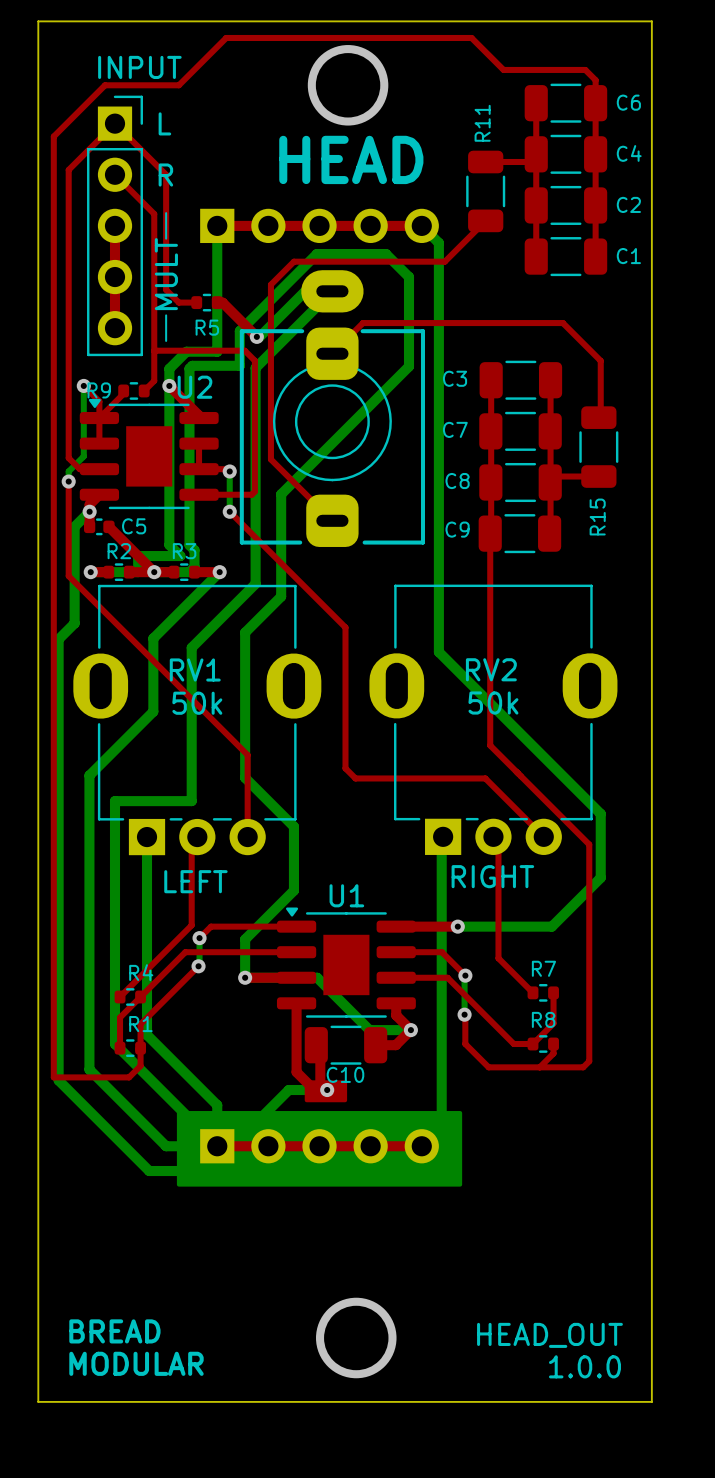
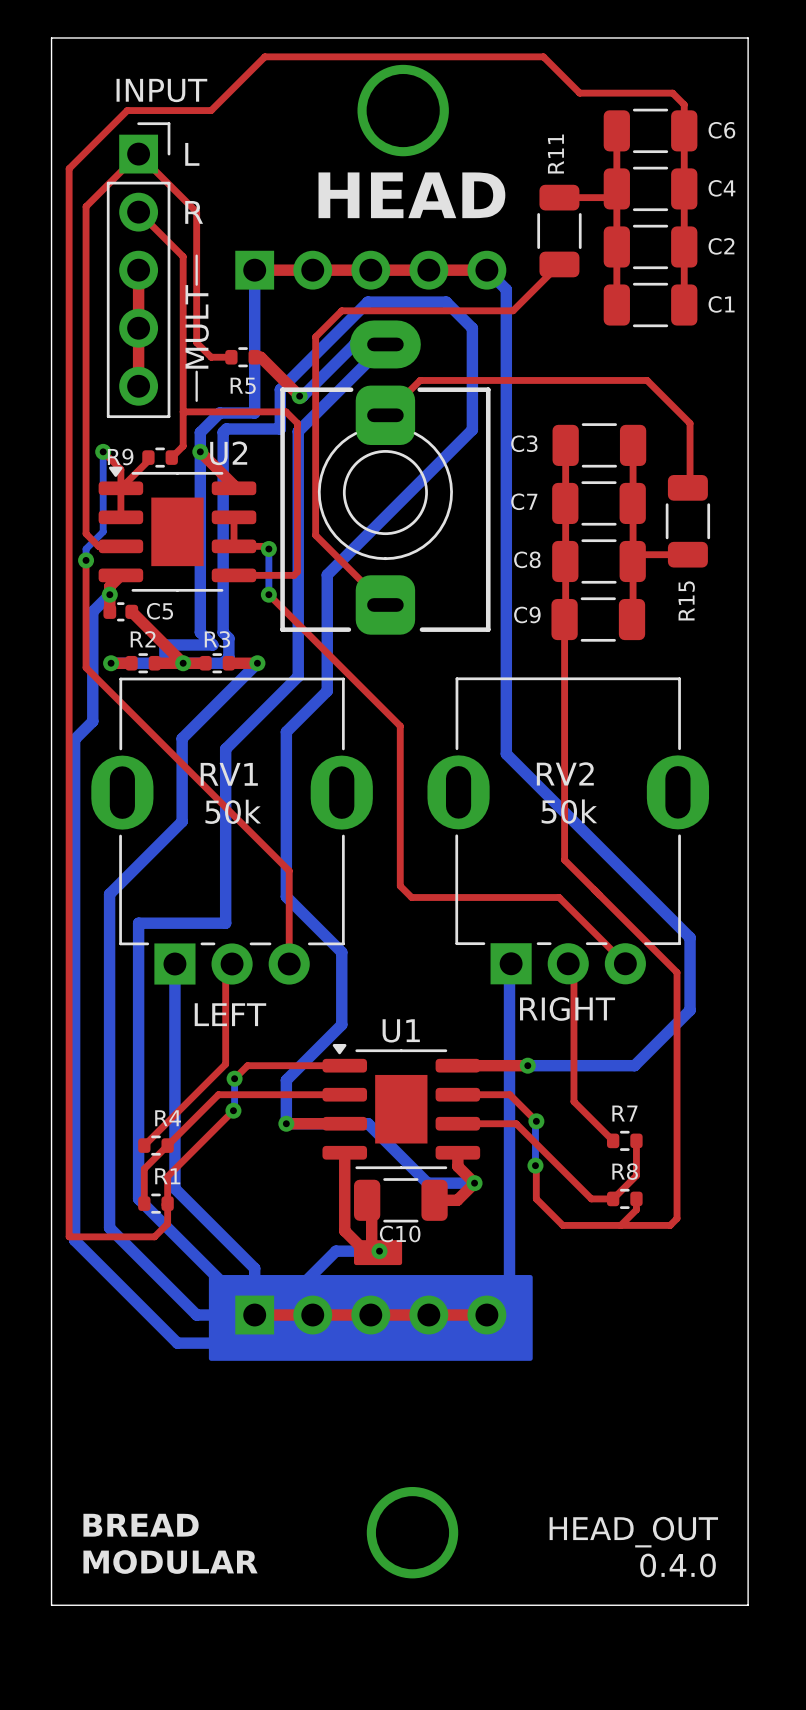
text: 1.0.0 (584, 1366) -> 0.4.0 (678, 1565)

